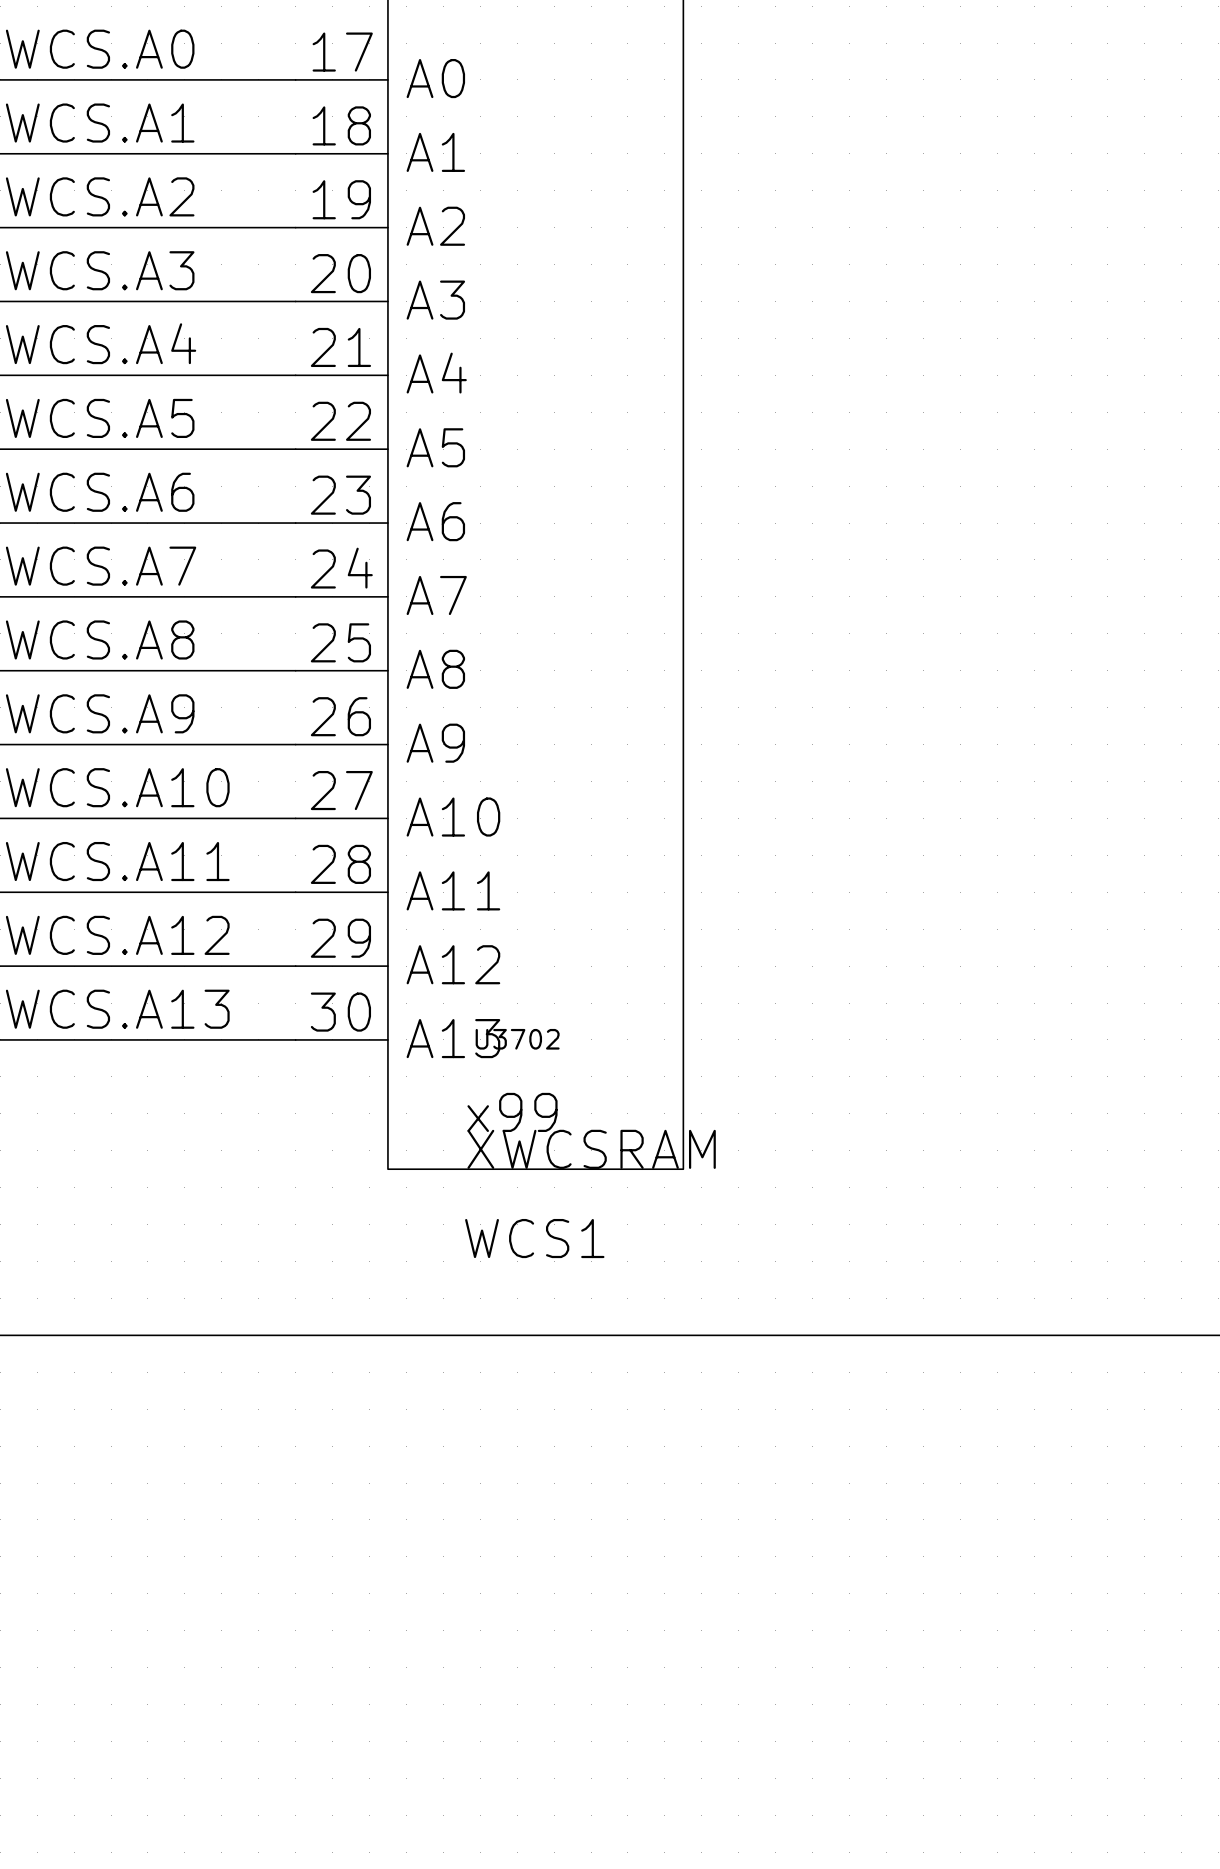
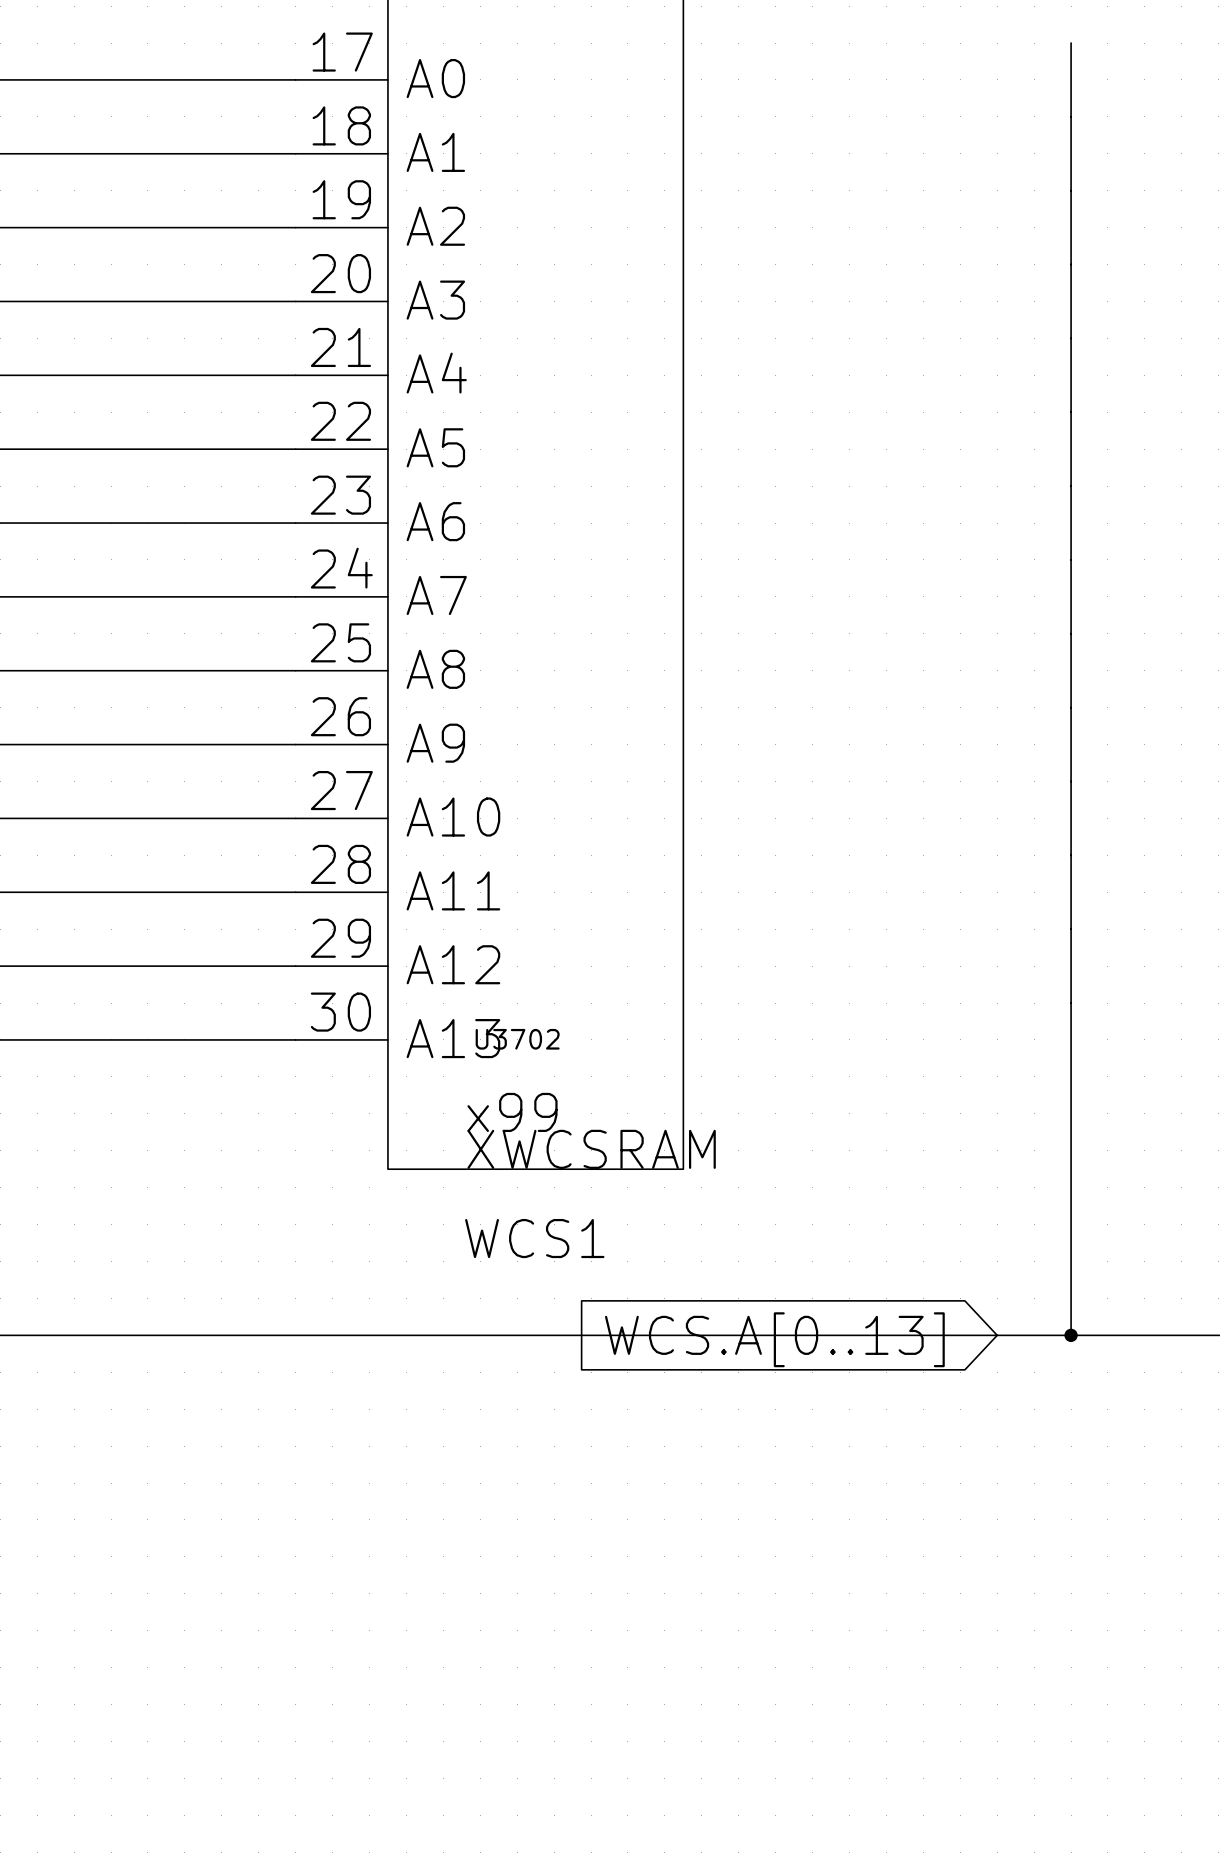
bus: none -> (1071, 43) (1071, 1335)
label: WCS.A0 (100, 49) -> none
label: WCS.A1 (100, 123) -> none
label: WCS.A2 (100, 196) -> none
label: WCS.A3 (100, 270) -> none
label: WCS.A4 (101, 343) -> none
label: WCS.A5 (100, 418) -> none
label: WCS.A6 (100, 492) -> none
label: WCS.A7 (101, 566) -> none
label: WCS.A8 (100, 639) -> none
label: WCS.A9 (100, 713) -> none
label: WCS.A10 (117, 787) -> none
label: WCS.A11 (117, 861) -> none
label: WCS.A12 (117, 935) -> none
label: WCS.A13 (117, 1009) -> none
junction: none -> (1071, 1335)
global label: none -> WCS.A[0..13] (774, 1339)

